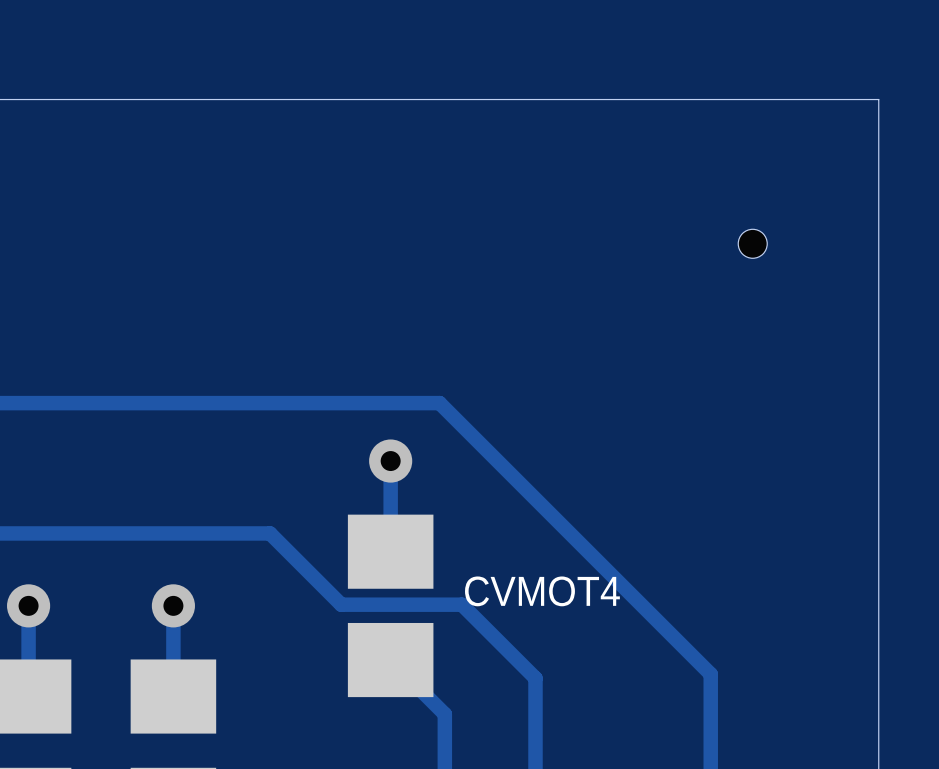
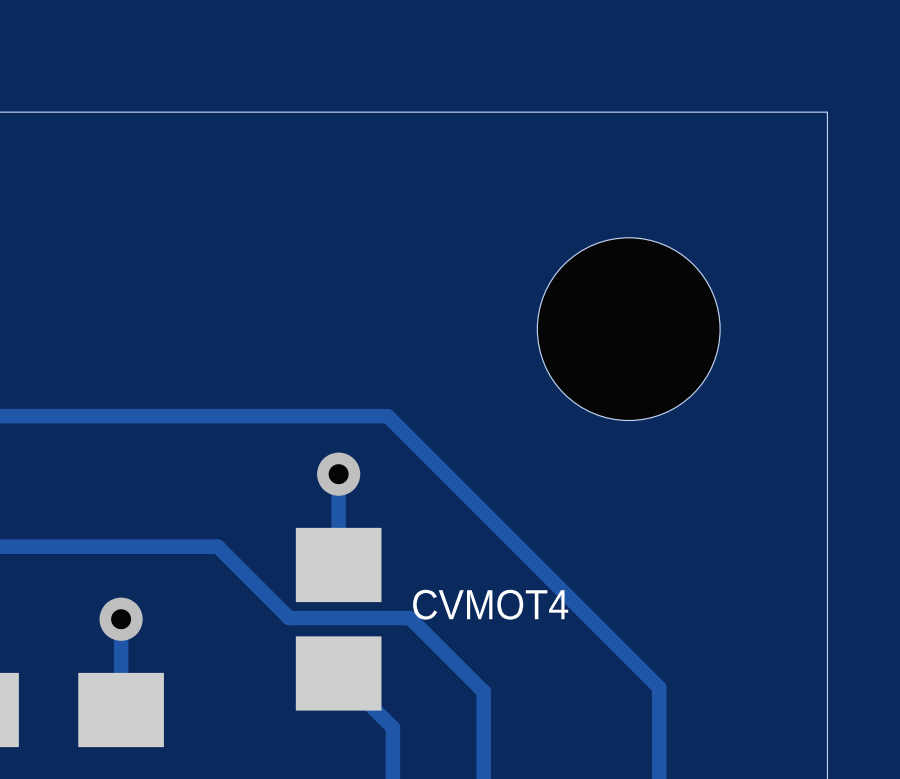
hole: (752, 243) -> none
hole: none -> (628, 329)

